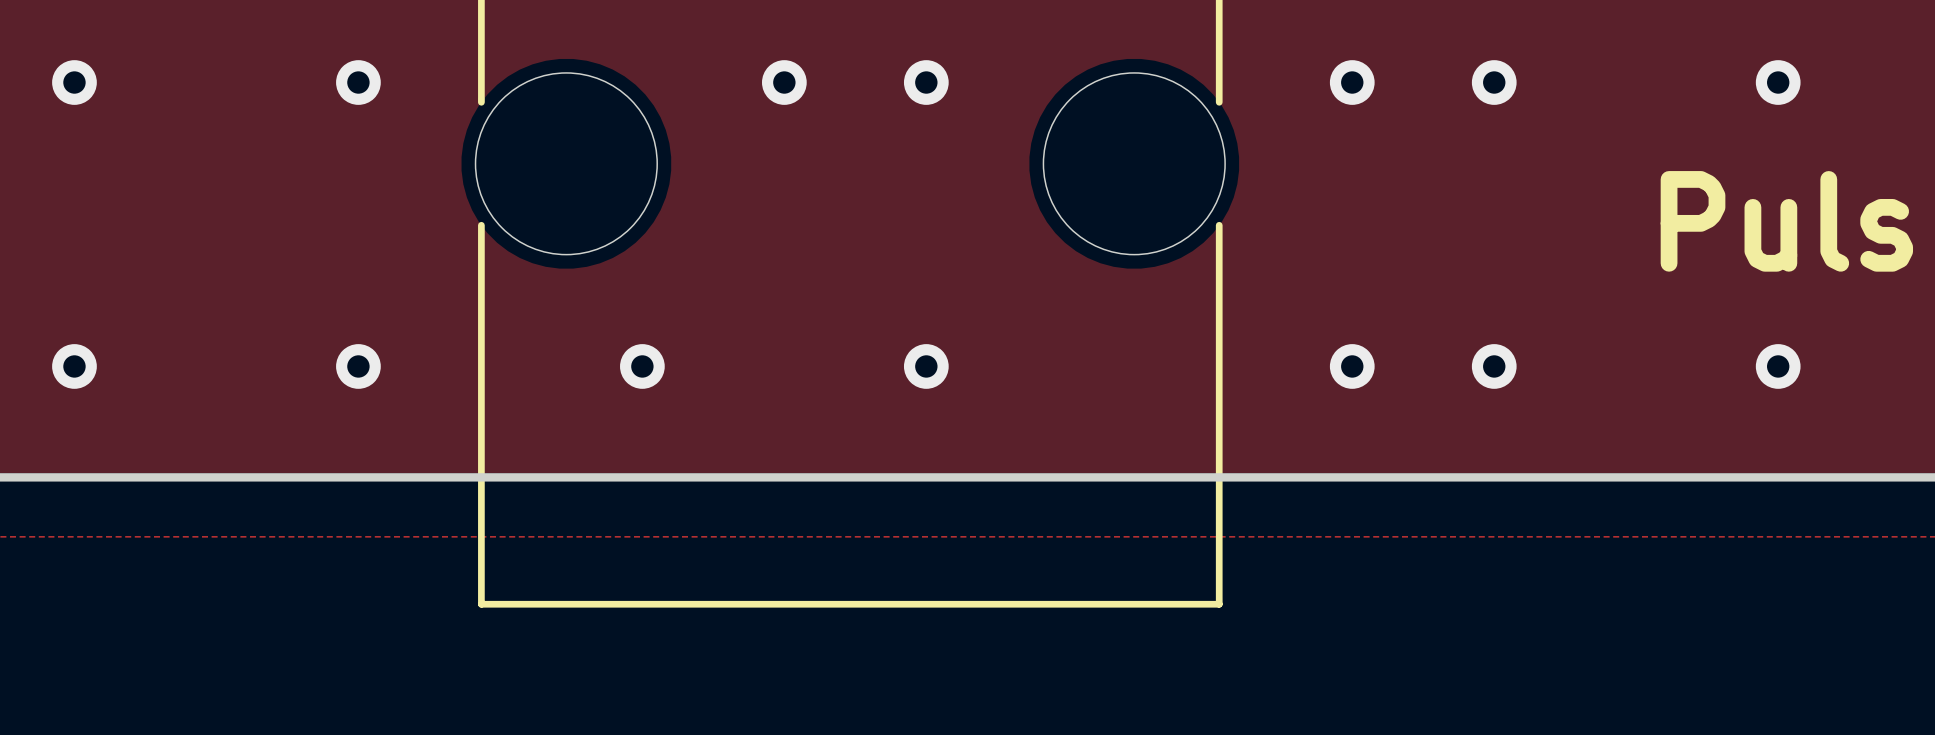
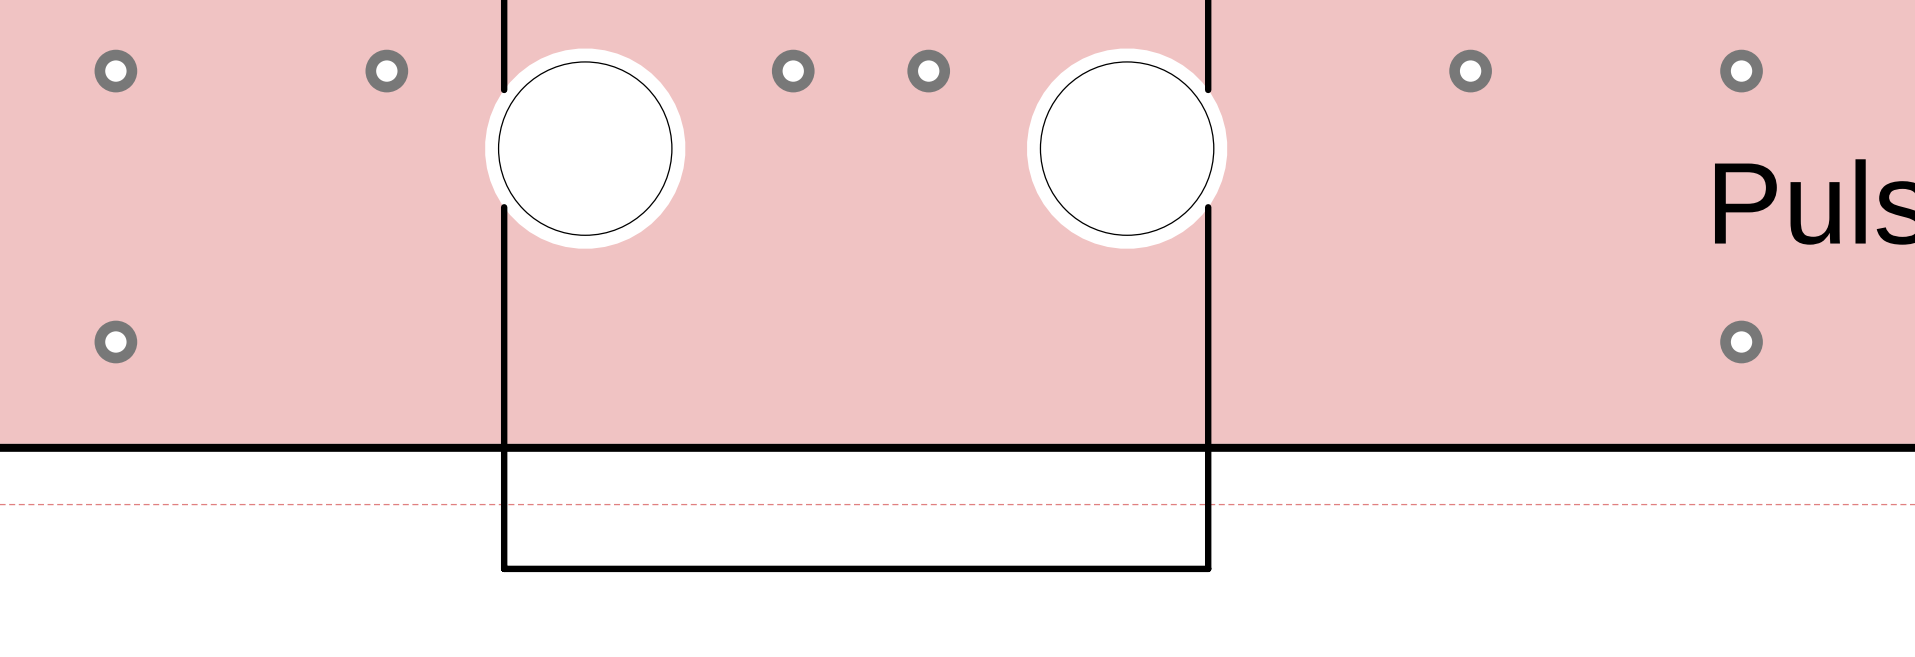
via: (1352, 82) -> none
via: (358, 366) -> none
via: (642, 366) -> none
via: (926, 366) -> none
via: (1352, 366) -> none
via: (1494, 366) -> none

